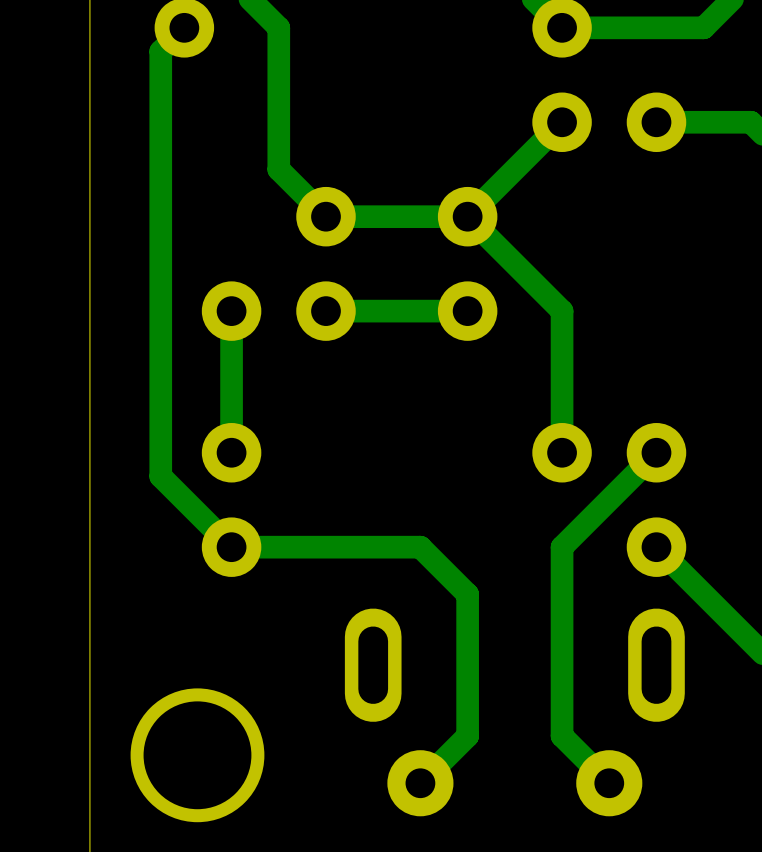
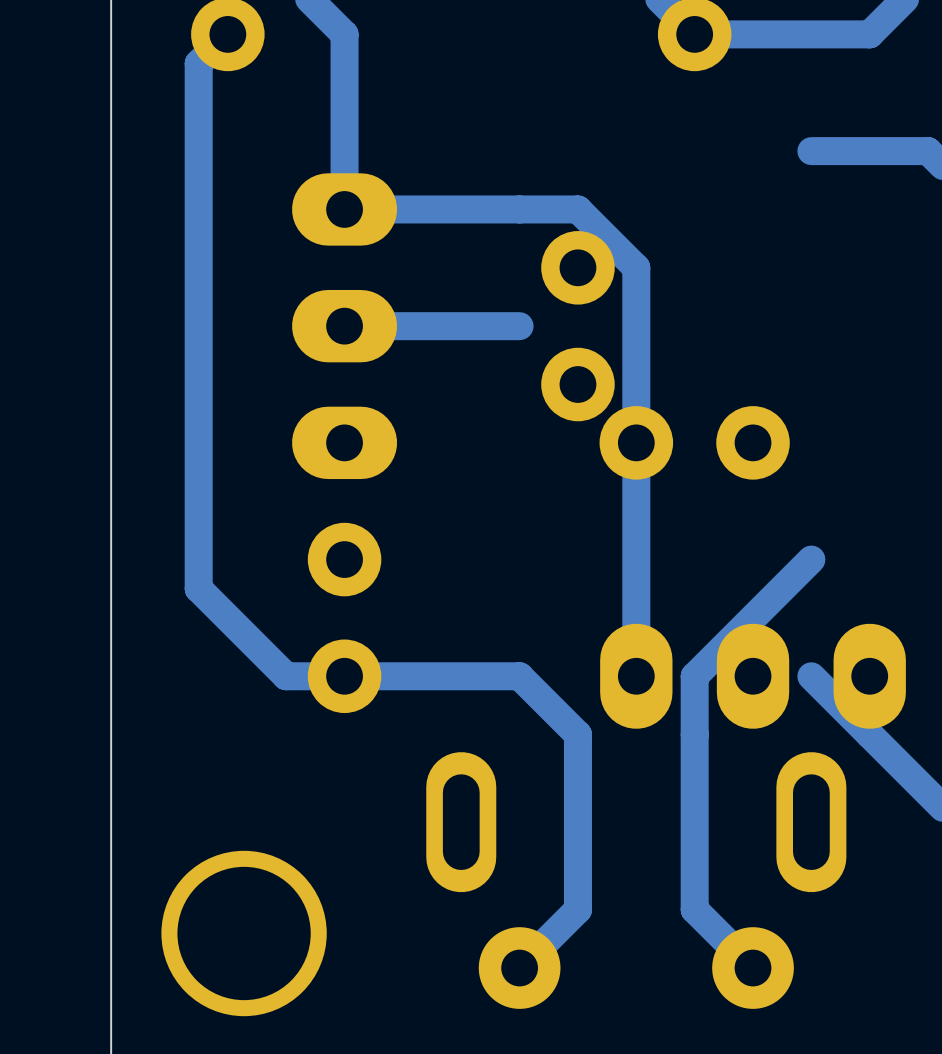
bottom track: (562, 122) (467, 216) -> none
part: (609, 122) -> none
bottom track: (278, 169) (326, 216) (467, 216) -> (344, 209) (577, 209) (636, 267) (636, 676)
part footprint: [201, 186, 356, 341] -> [292, 173, 398, 480]
bottom track: (467, 216) (562, 311) (562, 452) -> none
bottom track: (231, 311) (231, 452) -> none
bottom track: (467, 311) (326, 311) -> (519, 326) (344, 326)
part: none -> (694, 442)
part position: (231, 499) -> (344, 617)
part: (609, 499) -> none
part: none -> (753, 676)

